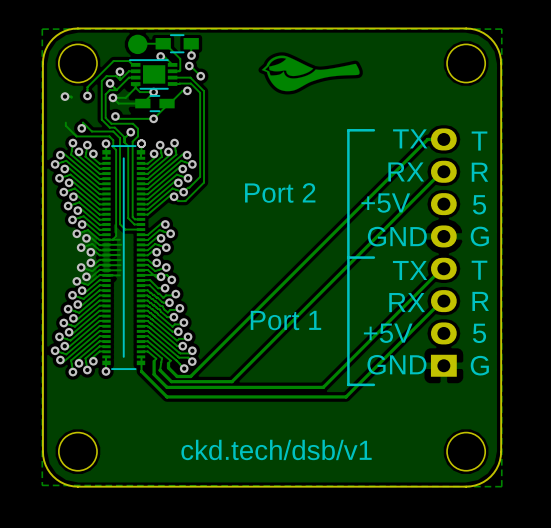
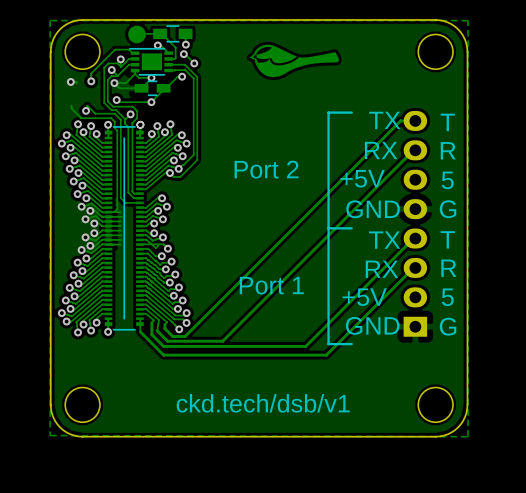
via: (161, 276) -> none

